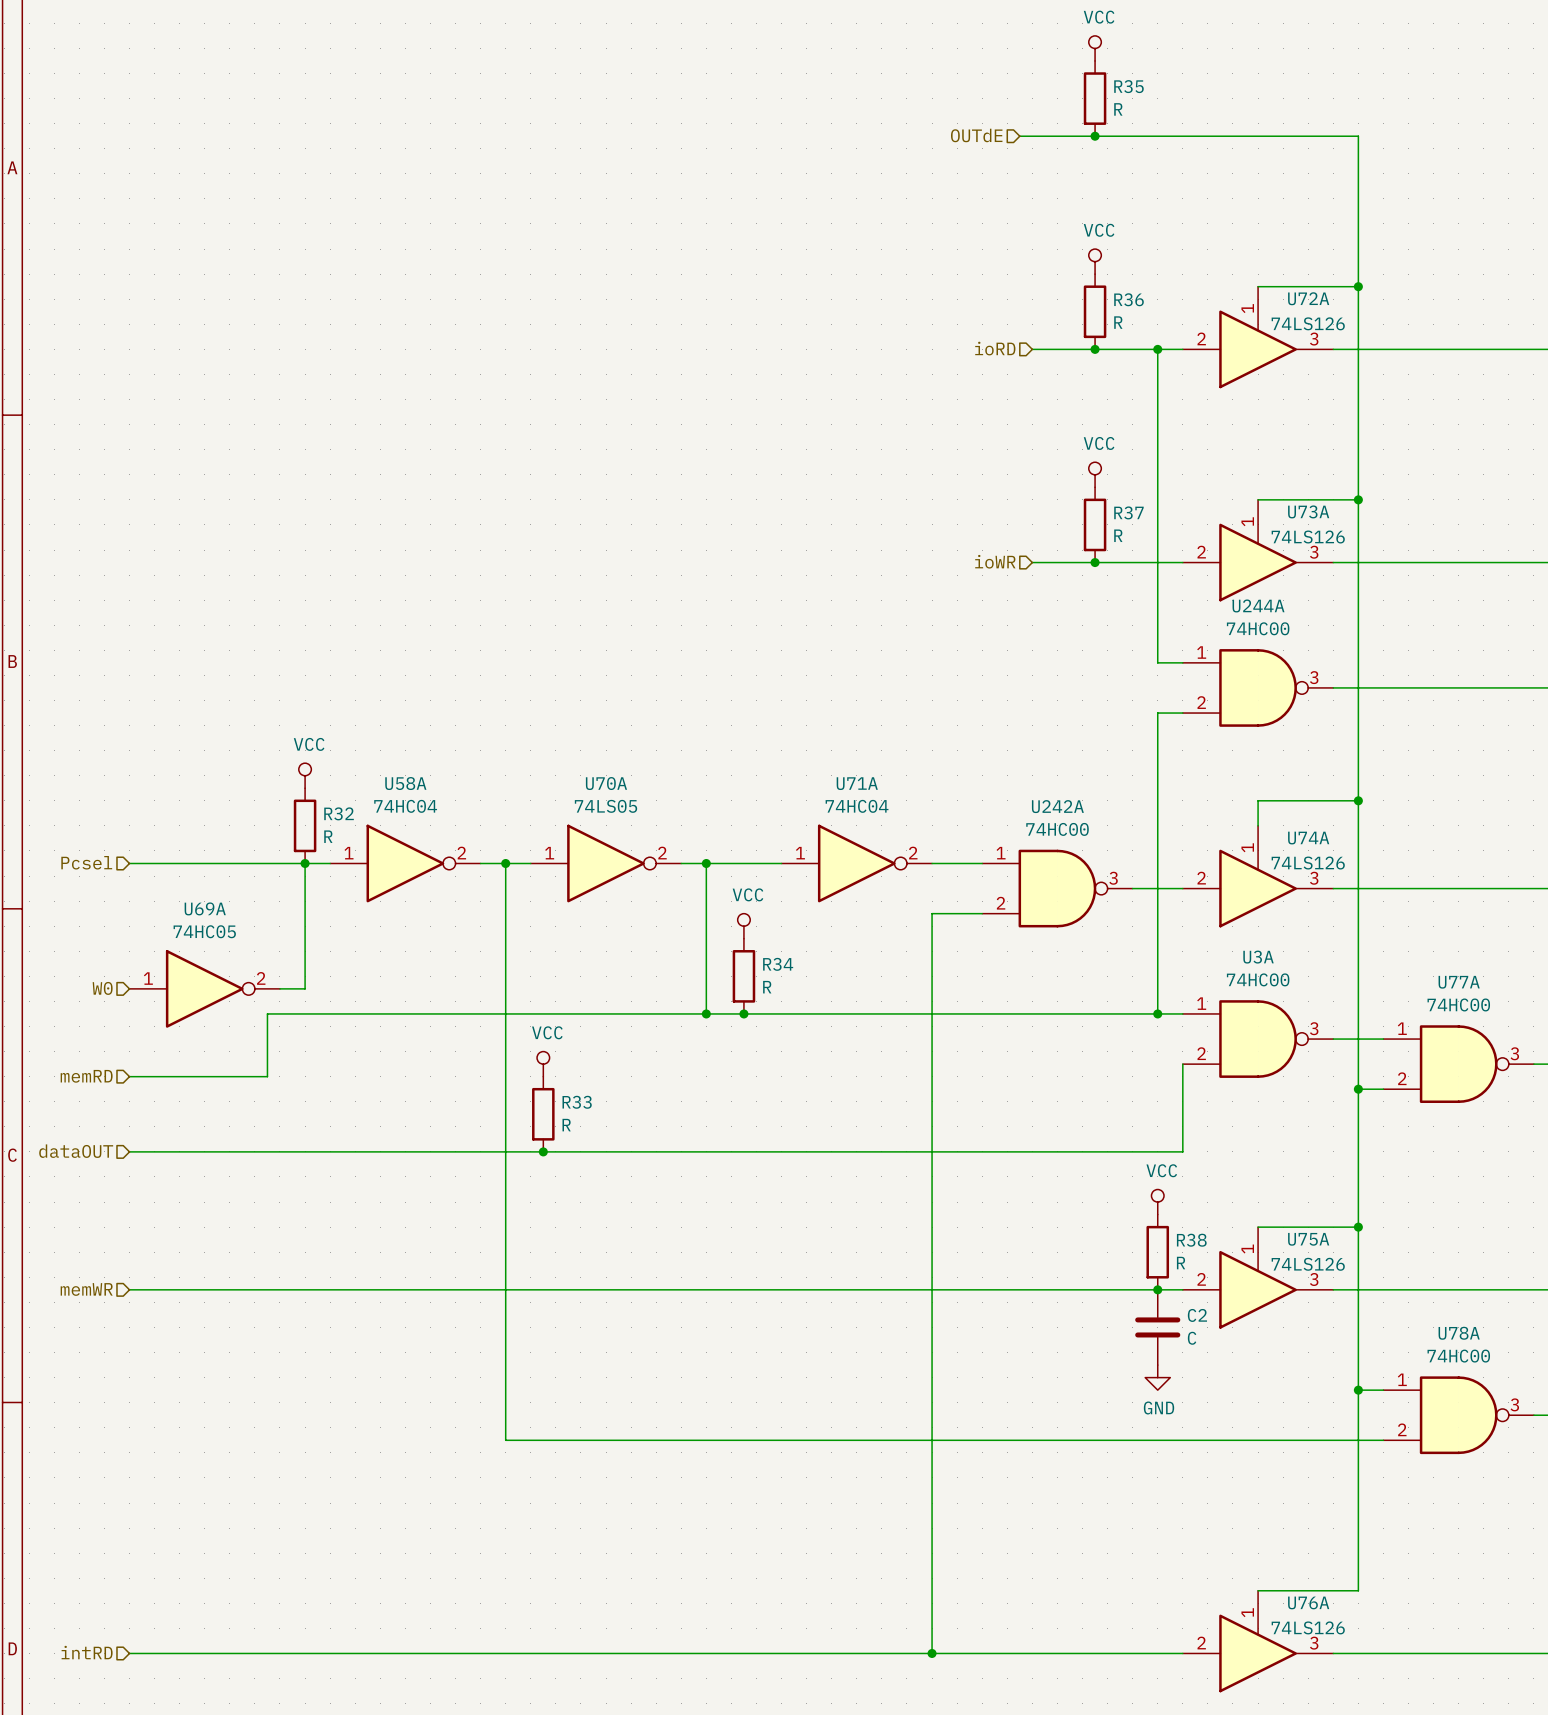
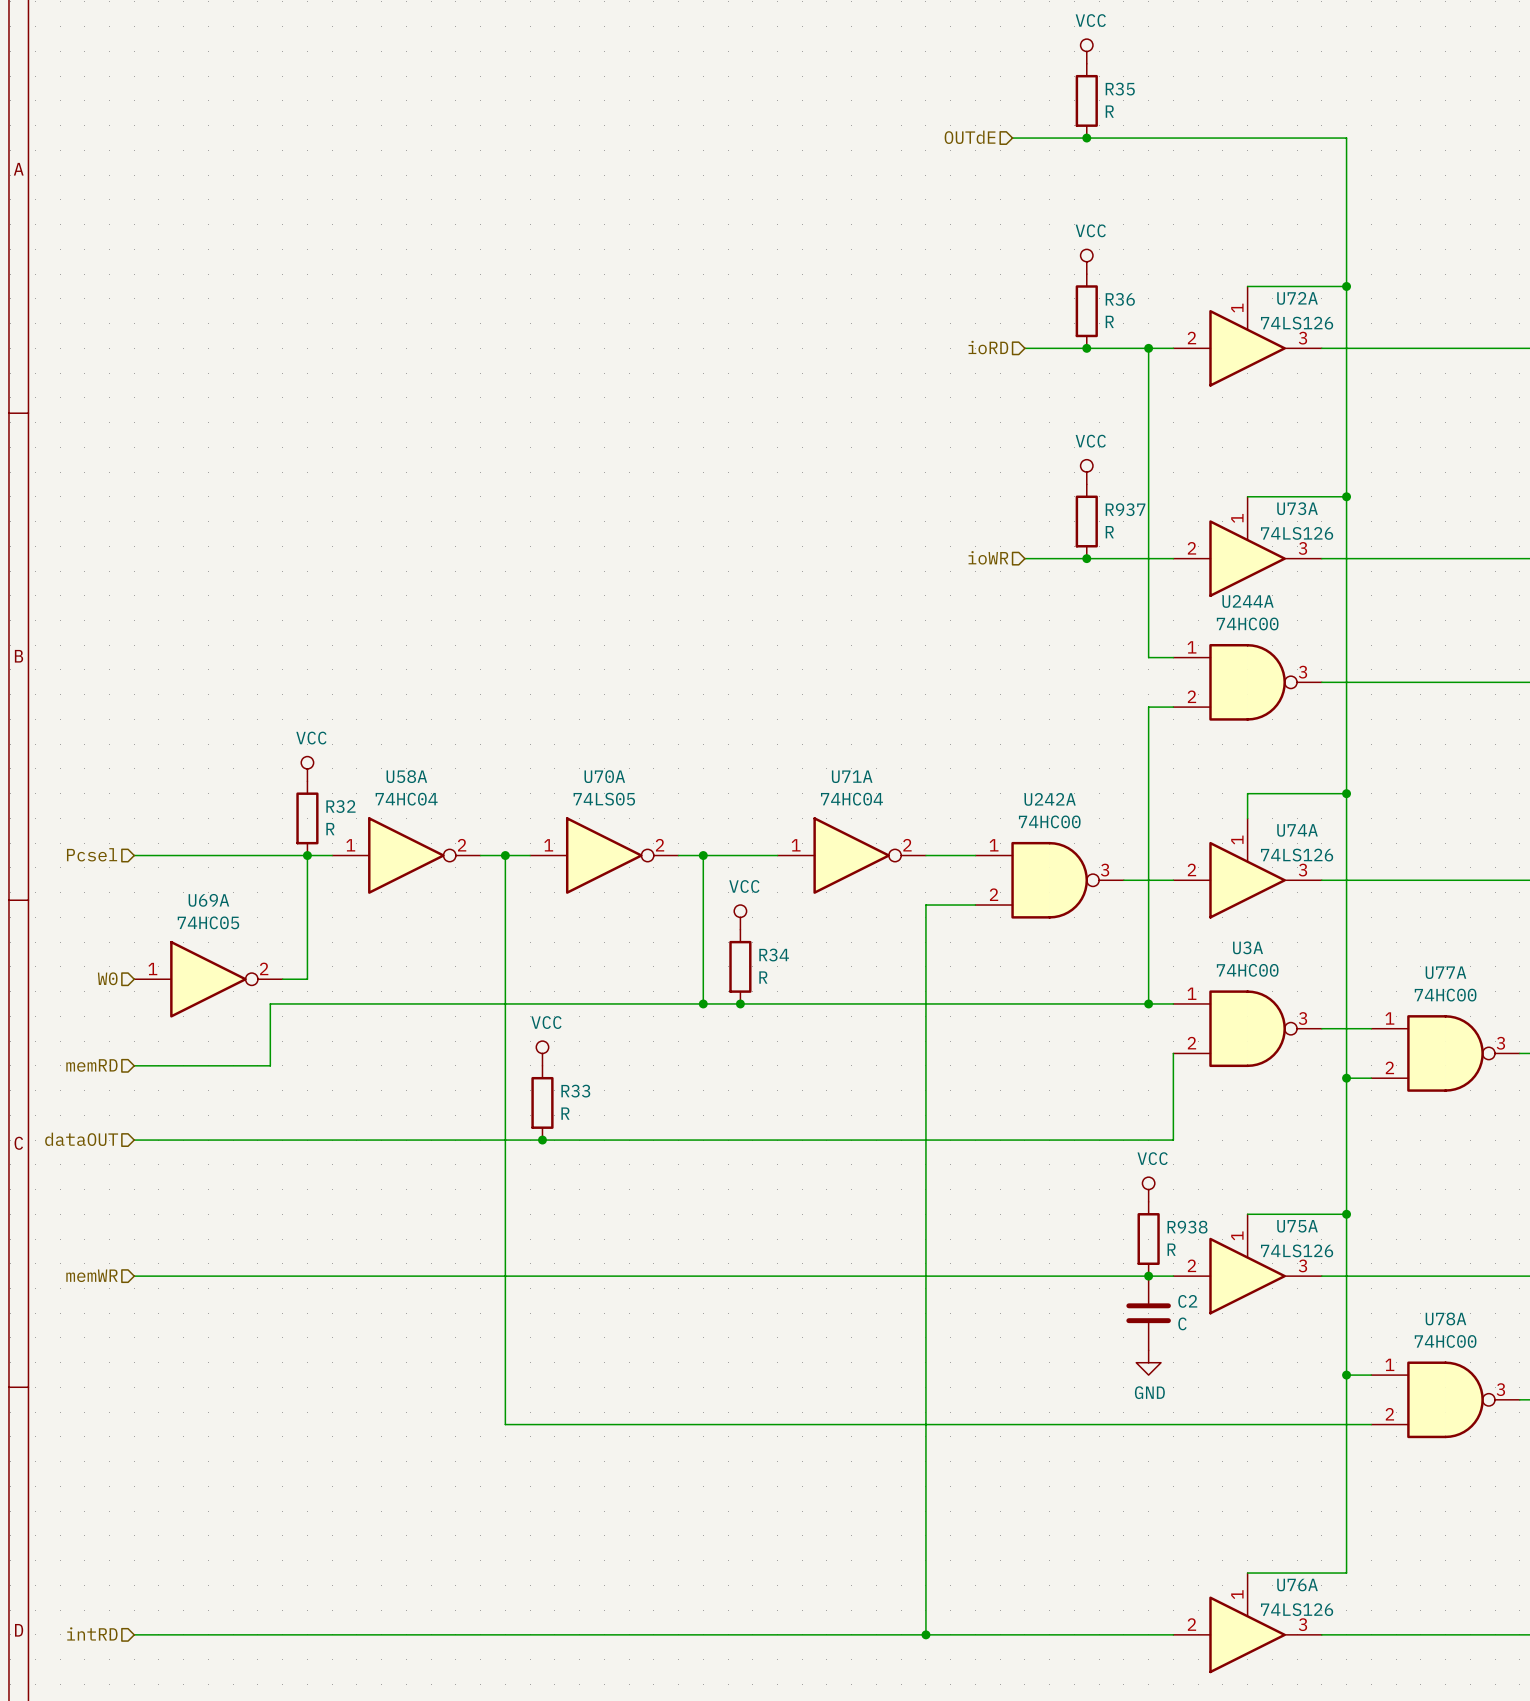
R37 name: R37 (1128, 512) -> R937 (1125, 509)
R38 name: R38 (1191, 1240) -> R938 (1187, 1227)

